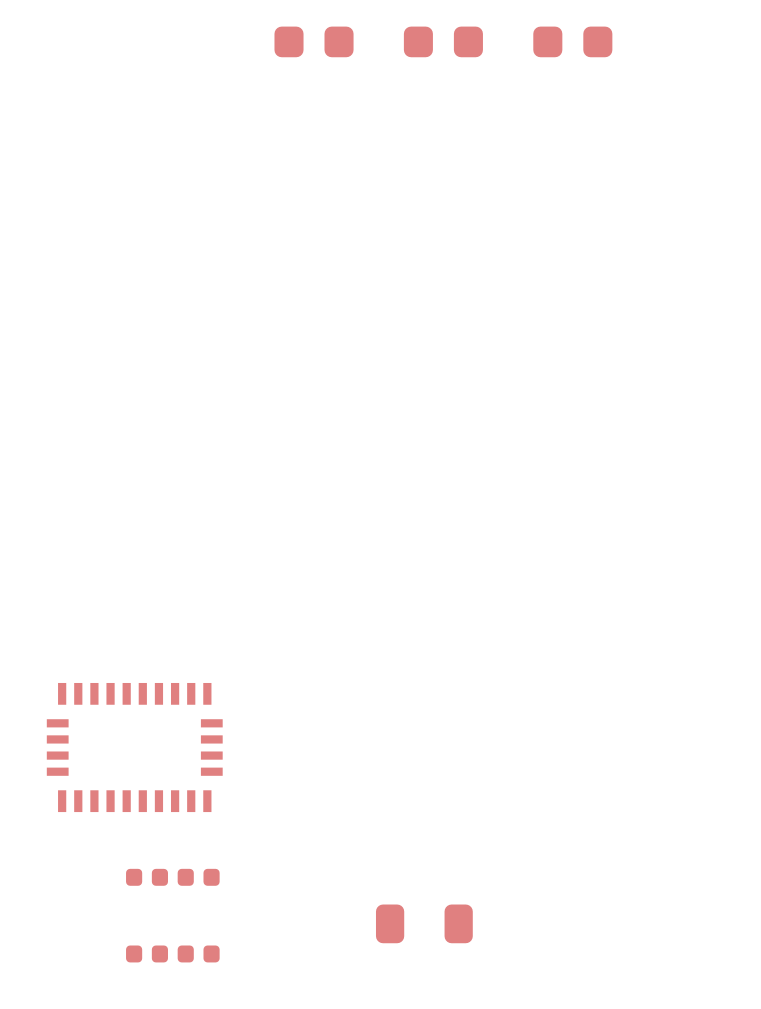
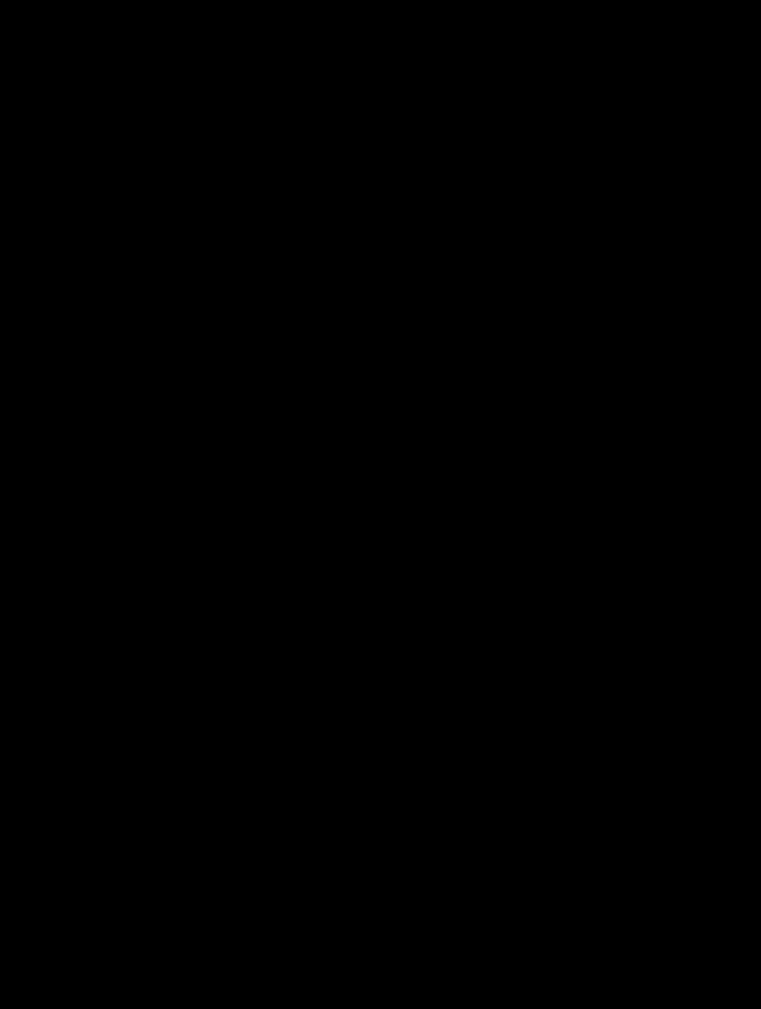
part: (314, 41) -> none
part: (443, 41) -> none
part: (572, 41) -> none
part: (134, 747) -> none
part: (172, 915) -> none
part: (424, 923) -> none

